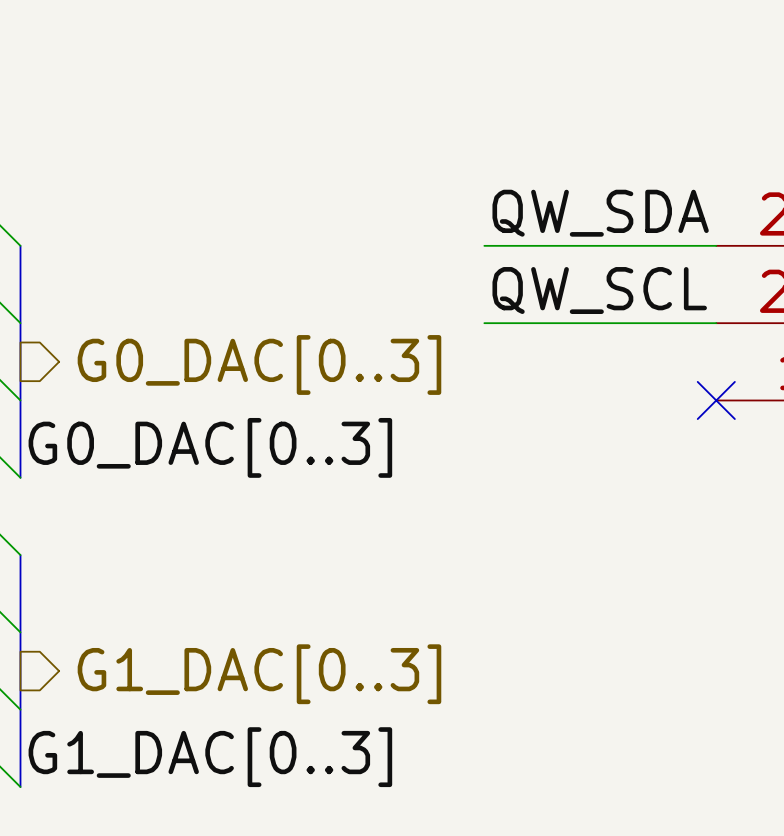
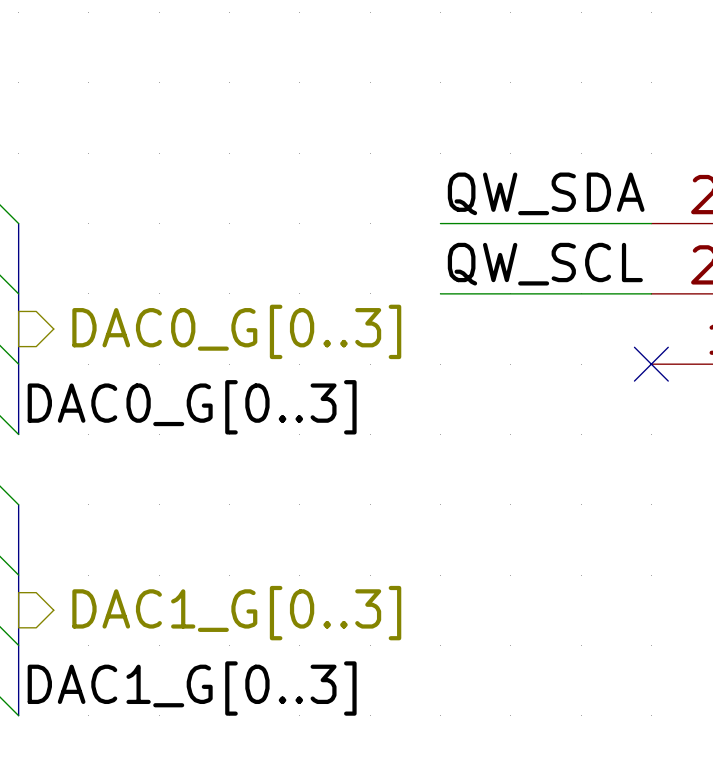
hierarchical label: G0_DAC[0..3] (259, 364) -> DAC0_G[0..3] (236, 331)
label: G0_DAC[0..3] (210, 447) -> DAC0_G[0..3] (192, 407)
hierarchical label: G1_DAC[0..3] (259, 674) -> DAC1_G[0..3] (236, 613)
label: G1_DAC[0..3] (210, 757) -> DAC1_G[0..3] (192, 688)

